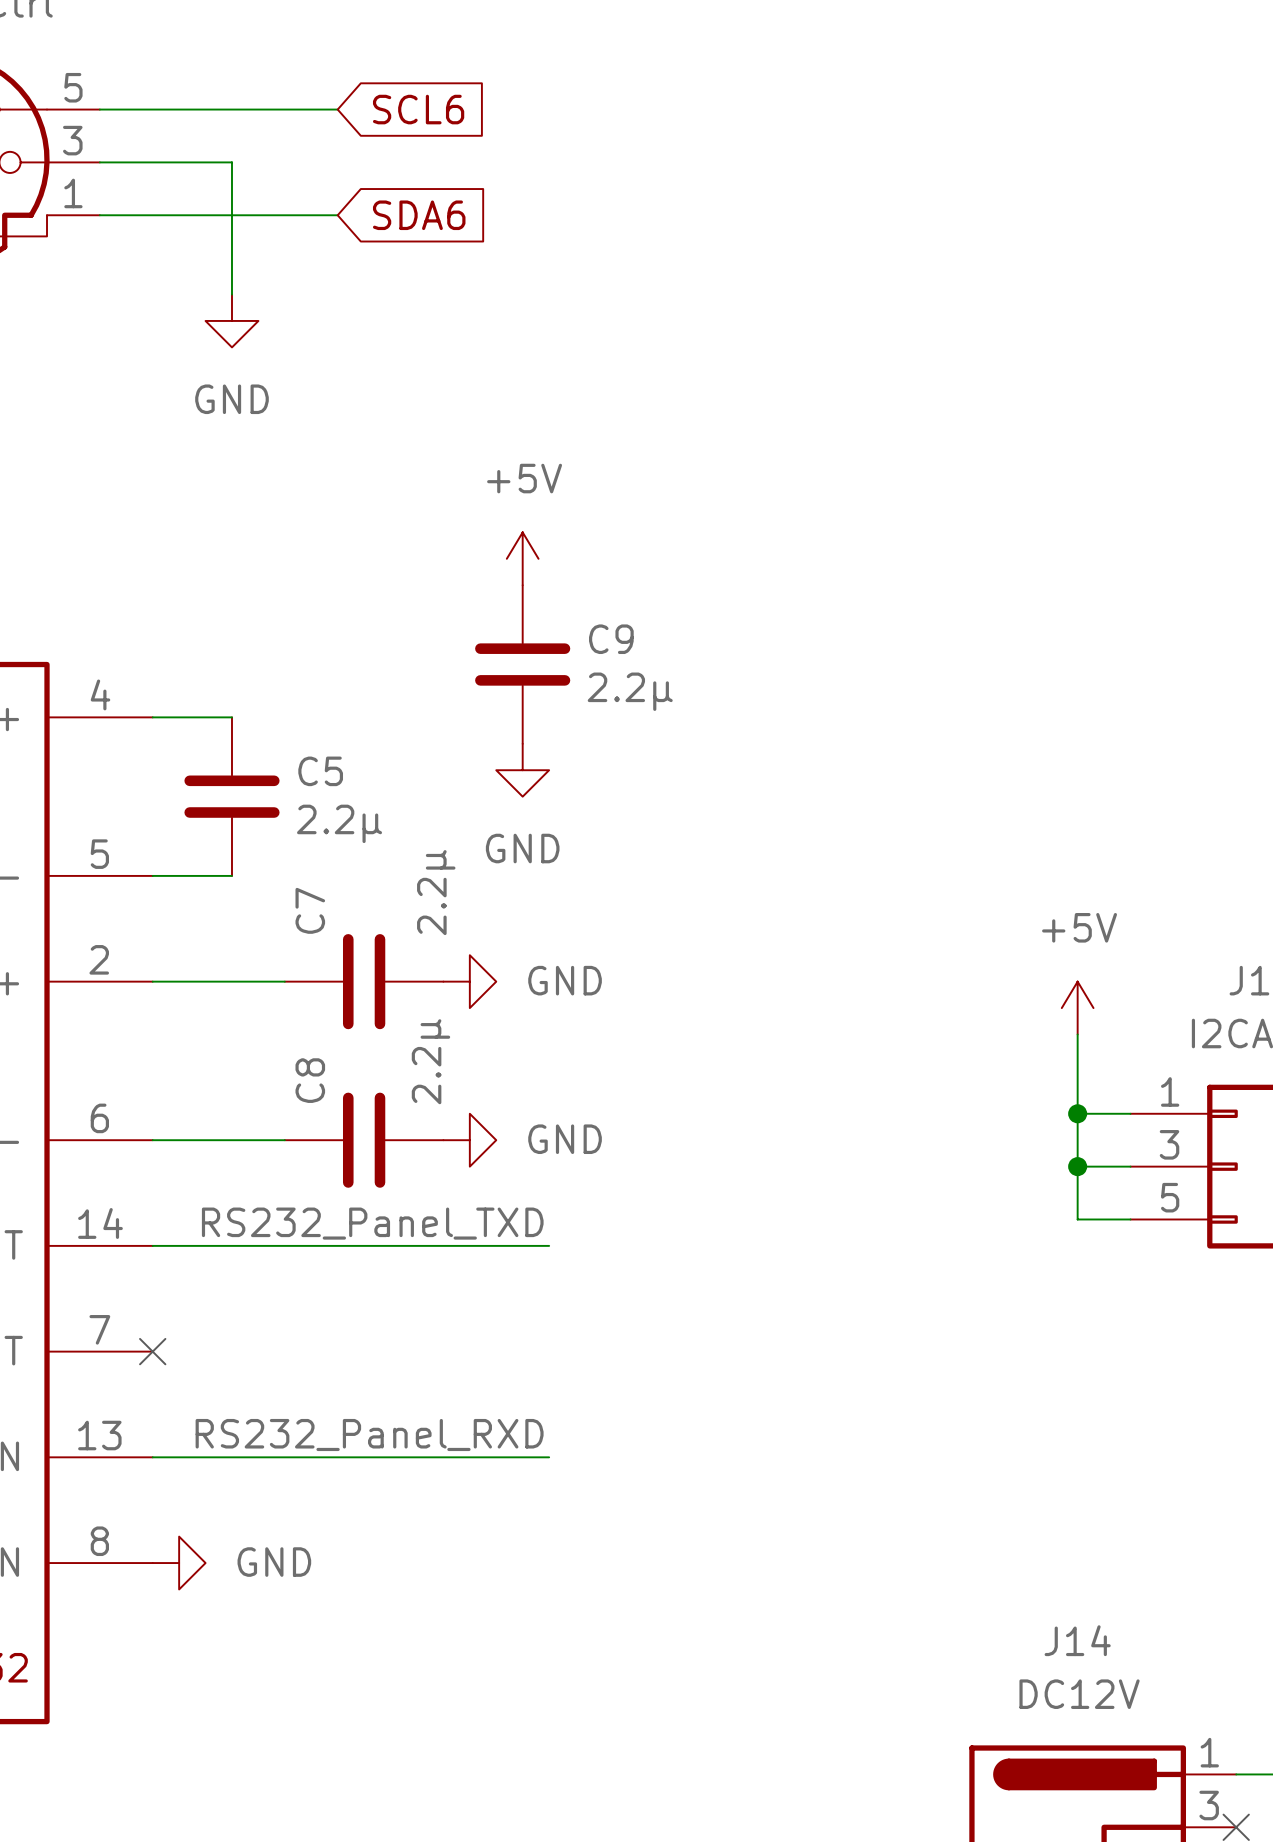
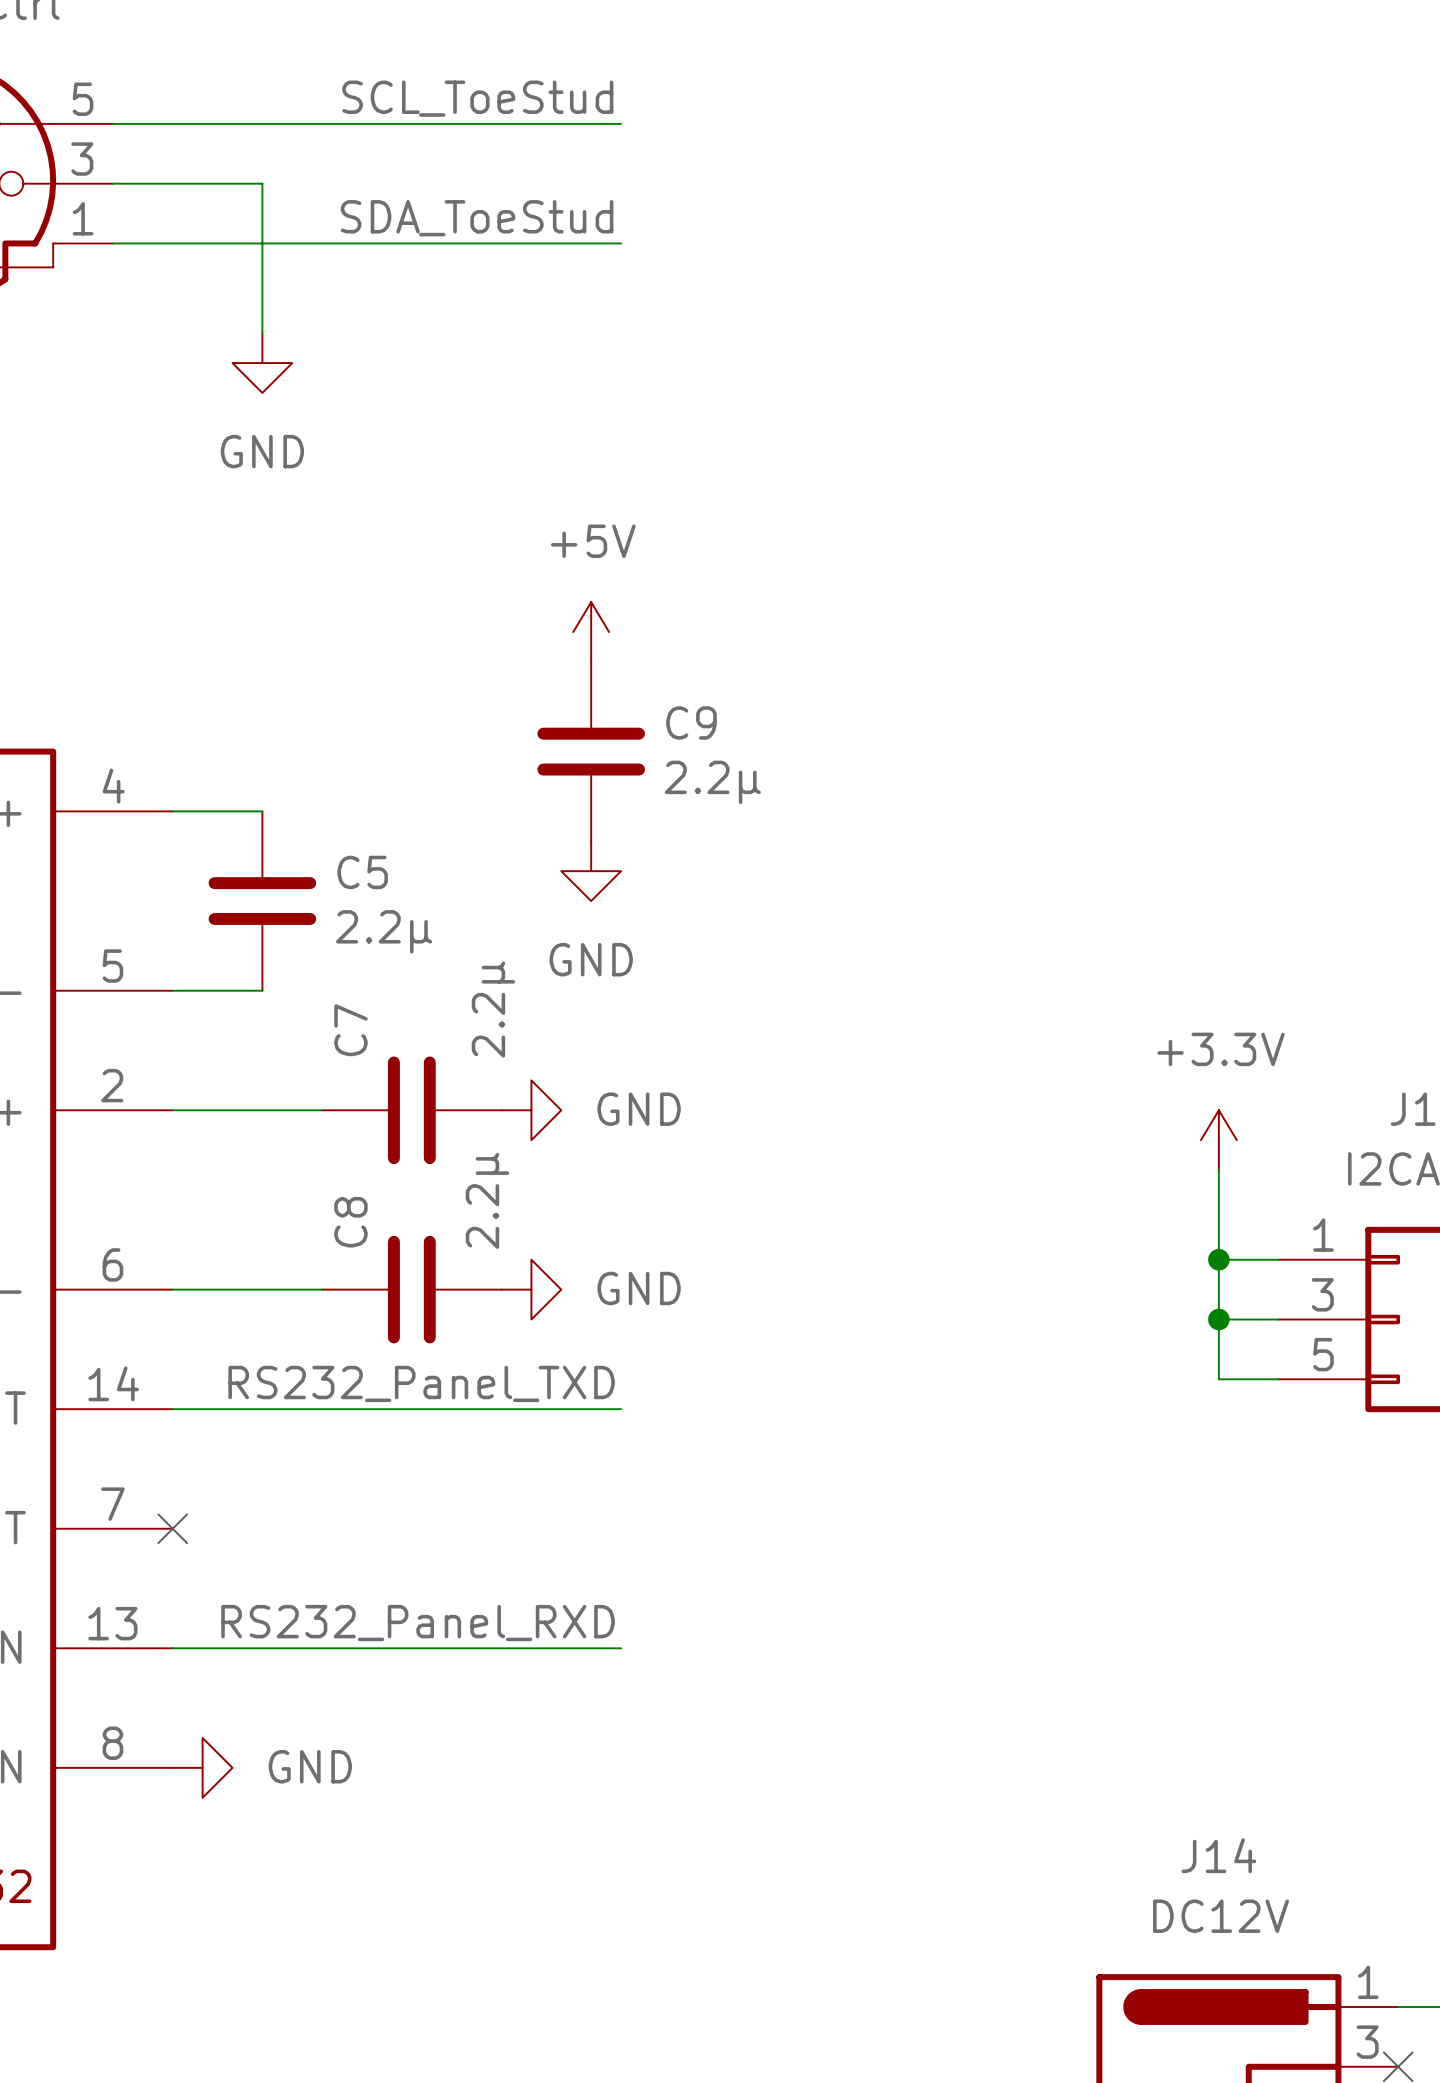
label: none -> SCL_ToeStud (477, 98)
wire: none -> (381, 123) (621, 123)
global label: SCL6 (418, 109) -> none
label: none -> SDA_ToeStud (477, 218)
wire: none -> (381, 243) (621, 243)
global label: SDA6 (419, 215) -> none
power symbol: +5V (1077, 1008) -> +3.3V (1218, 1140)

